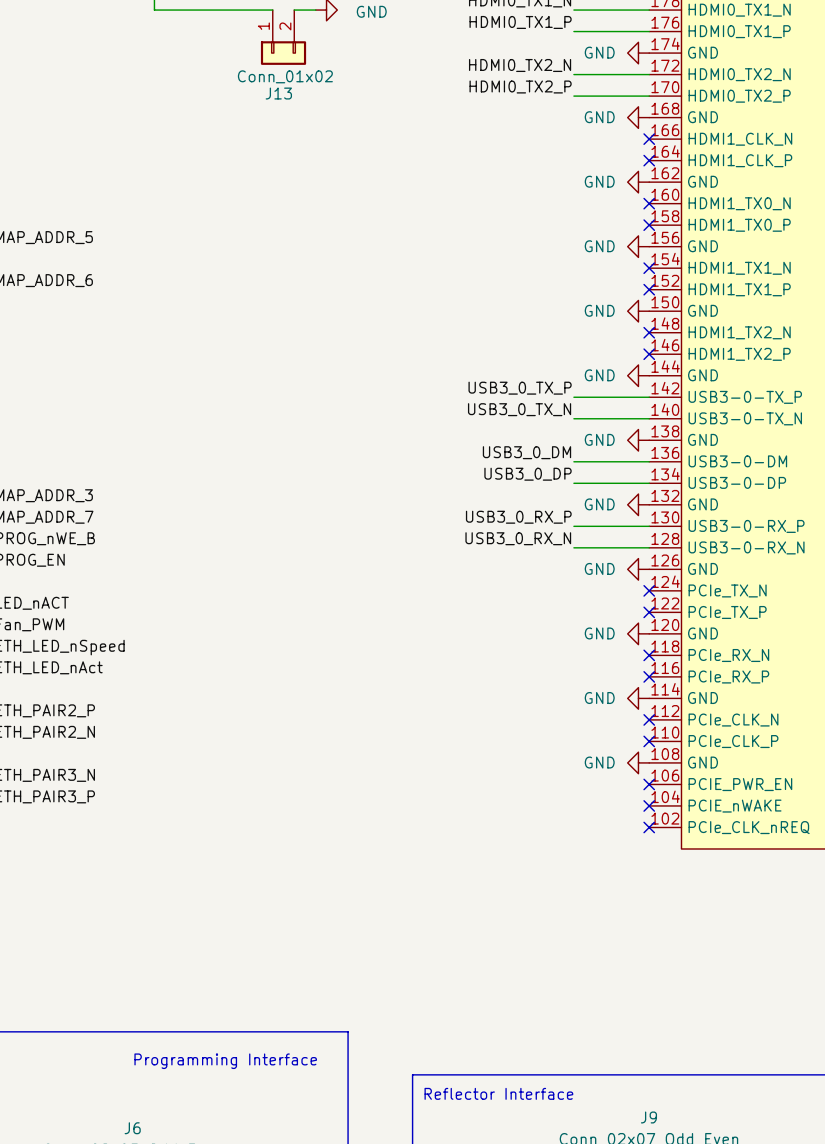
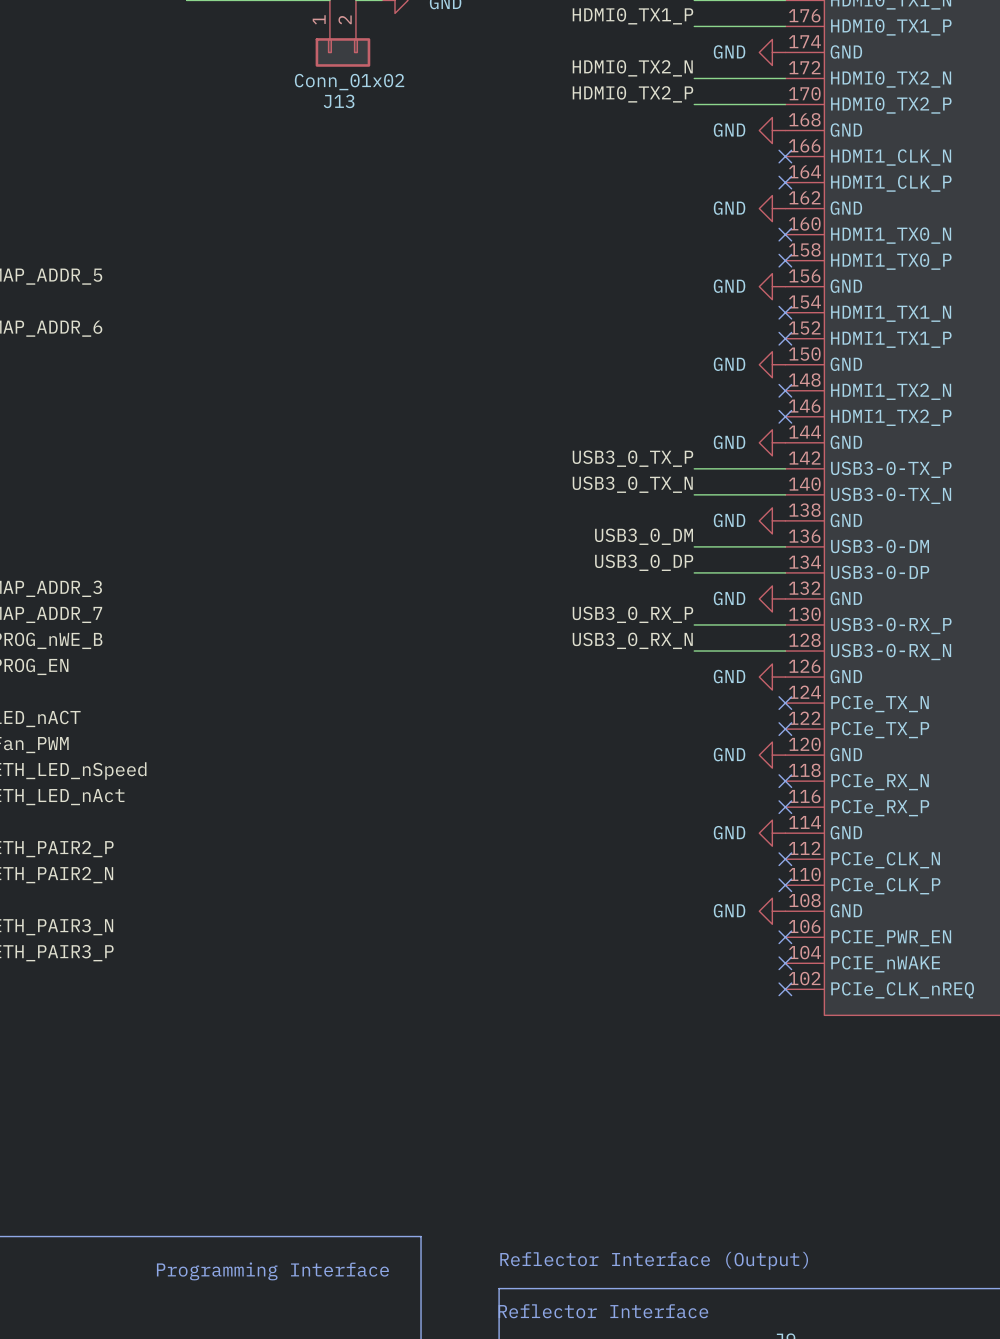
text: none -> Reflector Interface (Output) (654, 1260)

